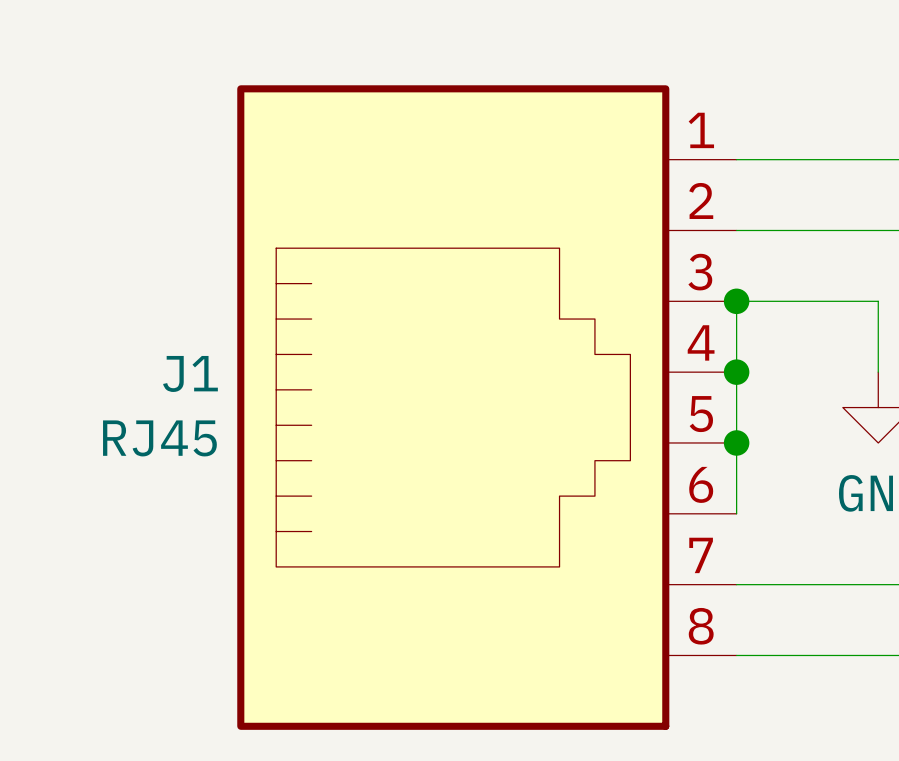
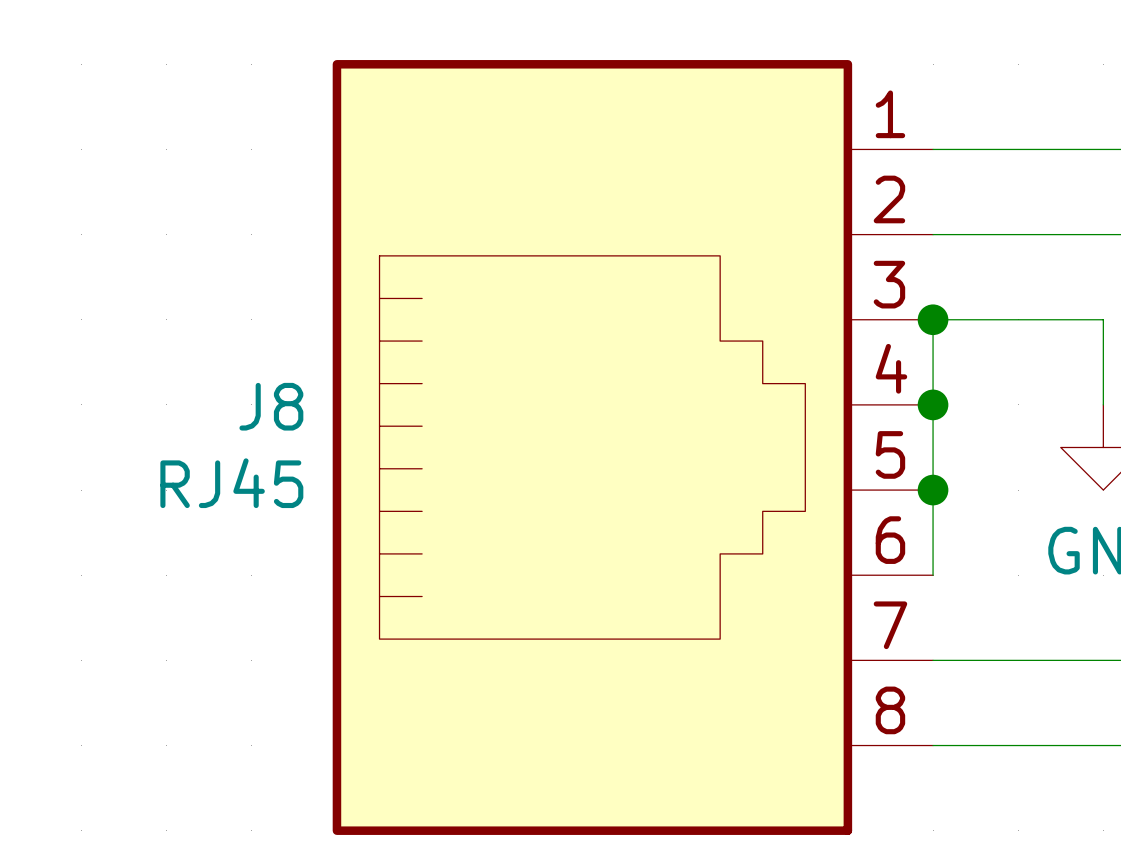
J1 name: J1 (190, 373) -> J8 (271, 406)

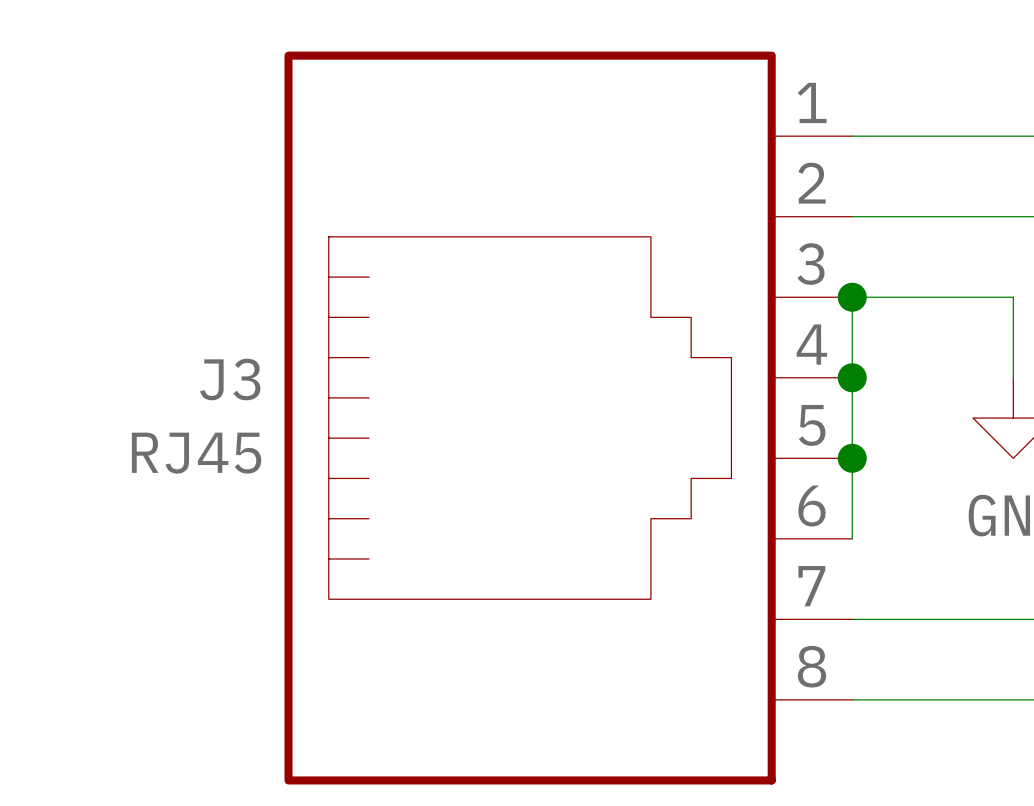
J8 name: J8 (271, 406) -> J3 (230, 379)

